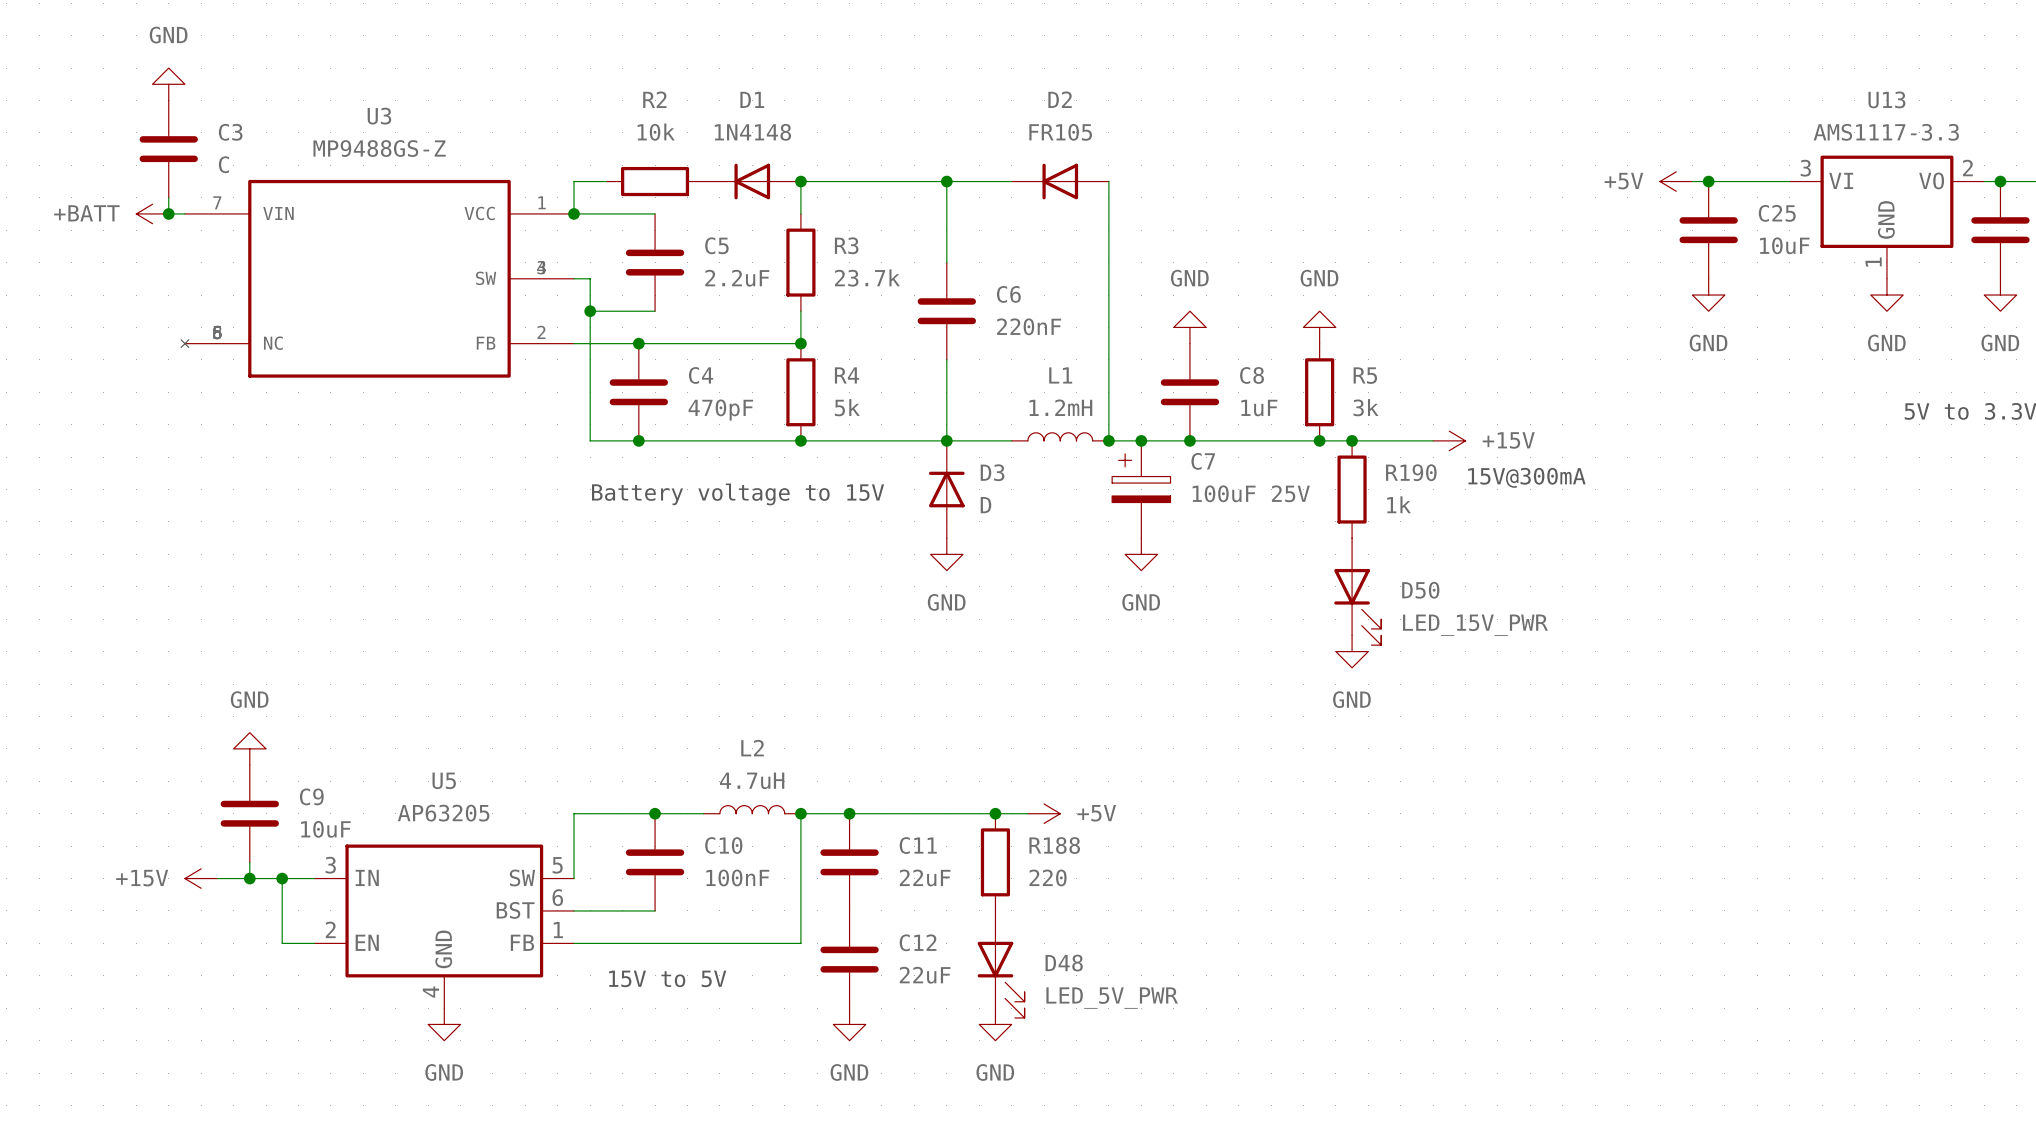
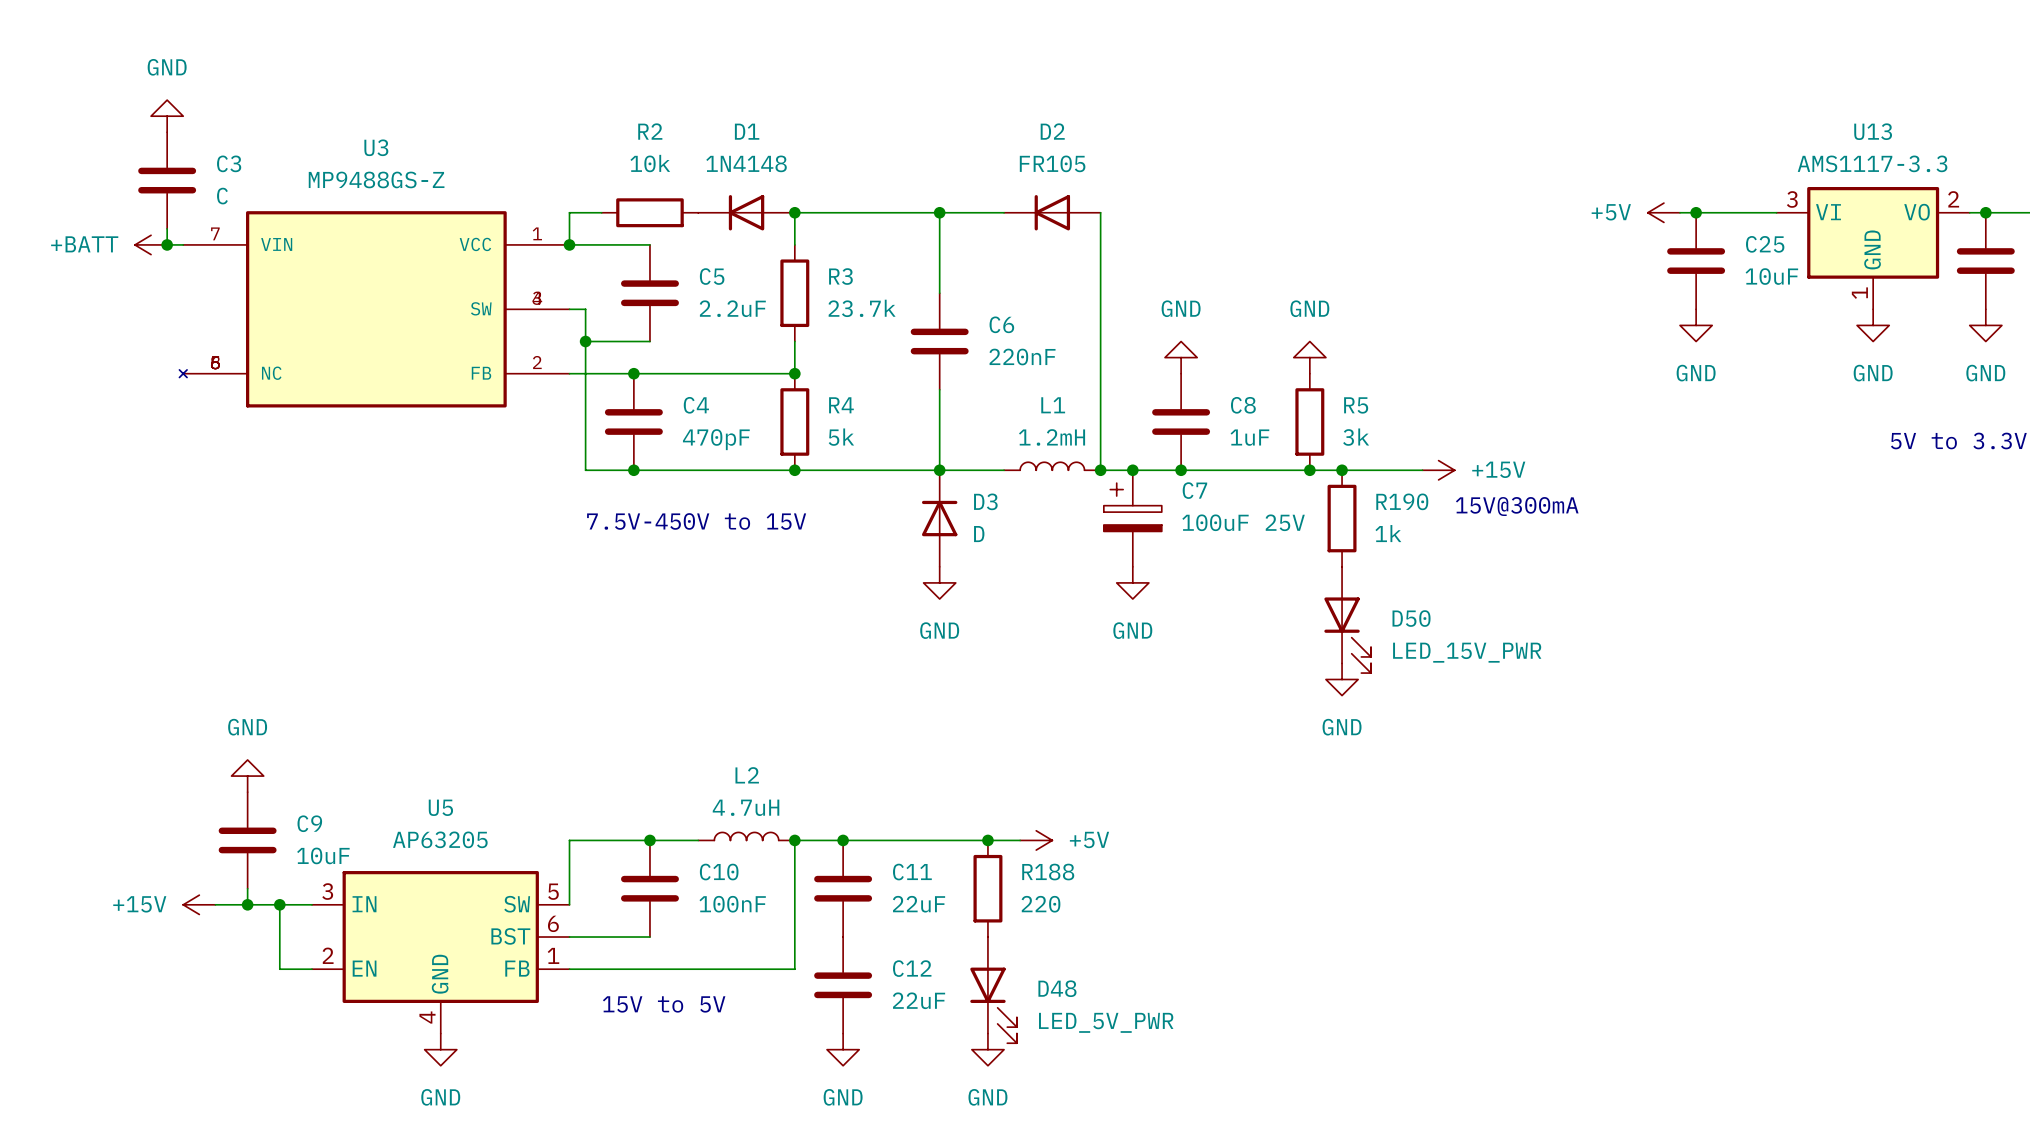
text: Battery voltage to 15V (738, 494) -> 7.5V-450V to 15V (696, 521)

